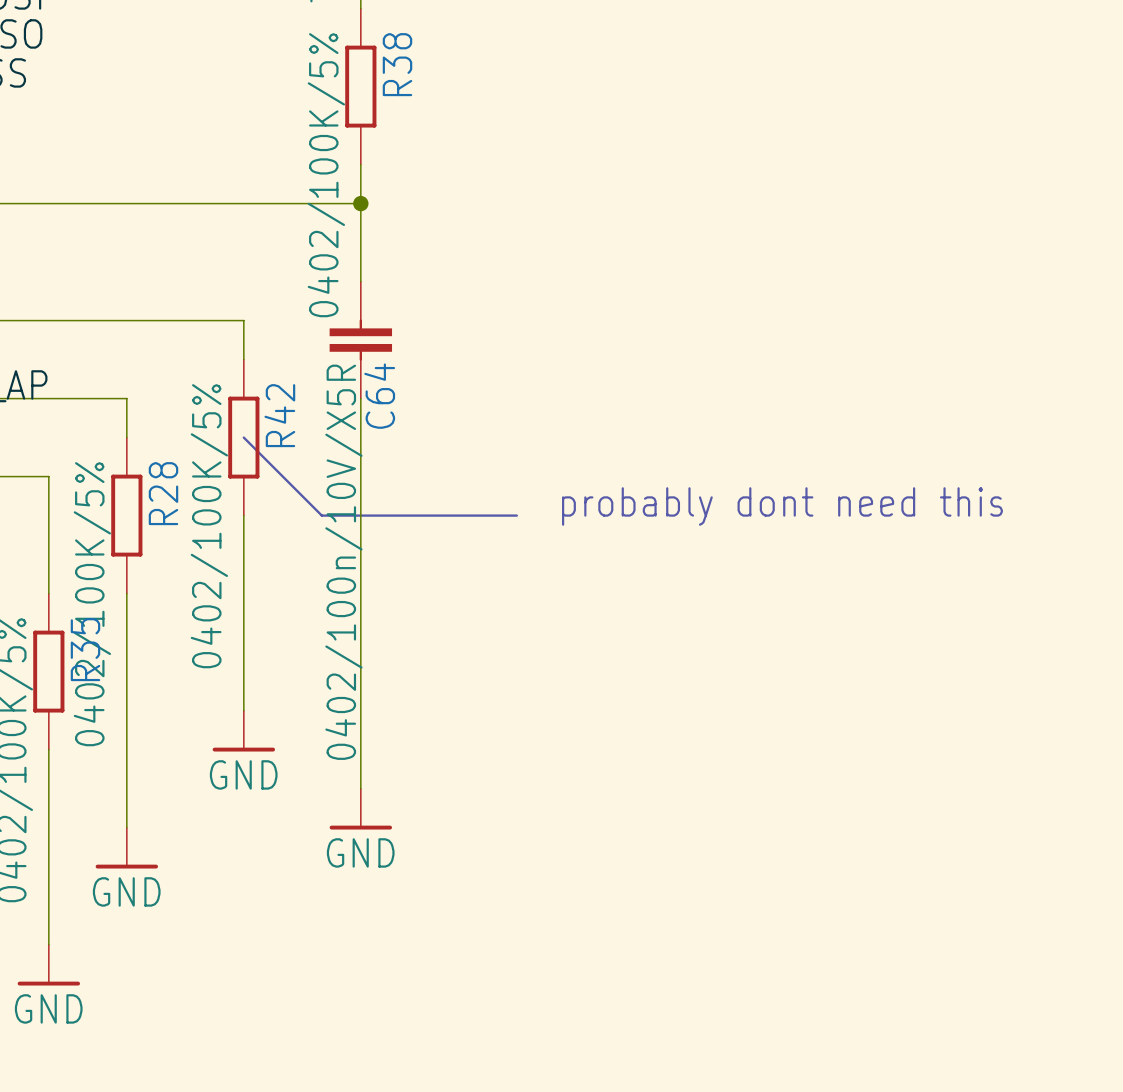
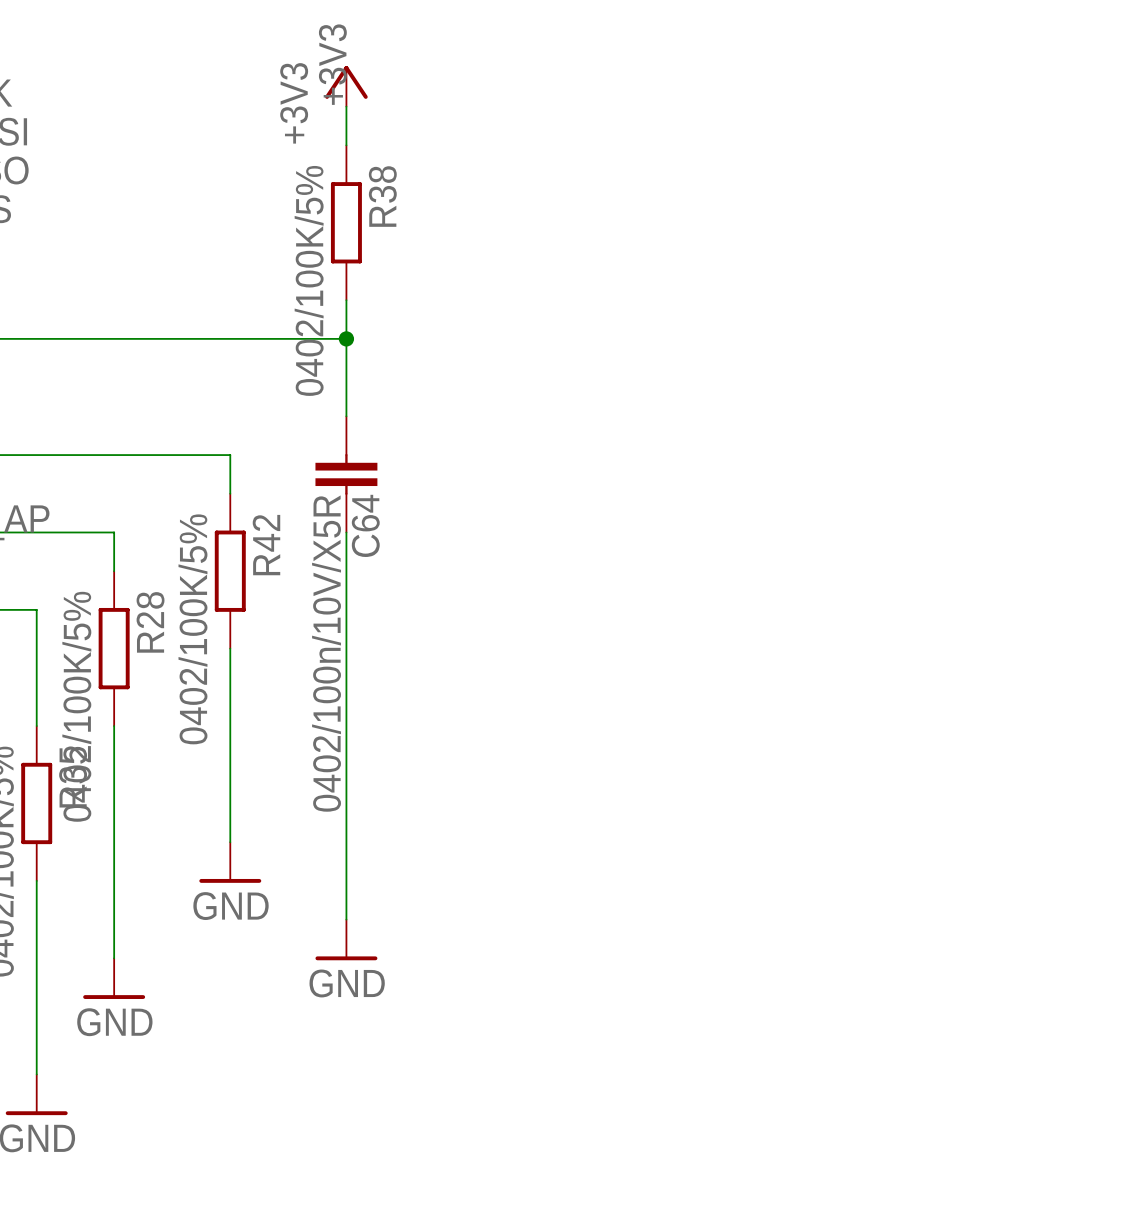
line: (243, 437) (321, 515) (516, 515) -> none
text: probably dont need this (782, 506) -> none

